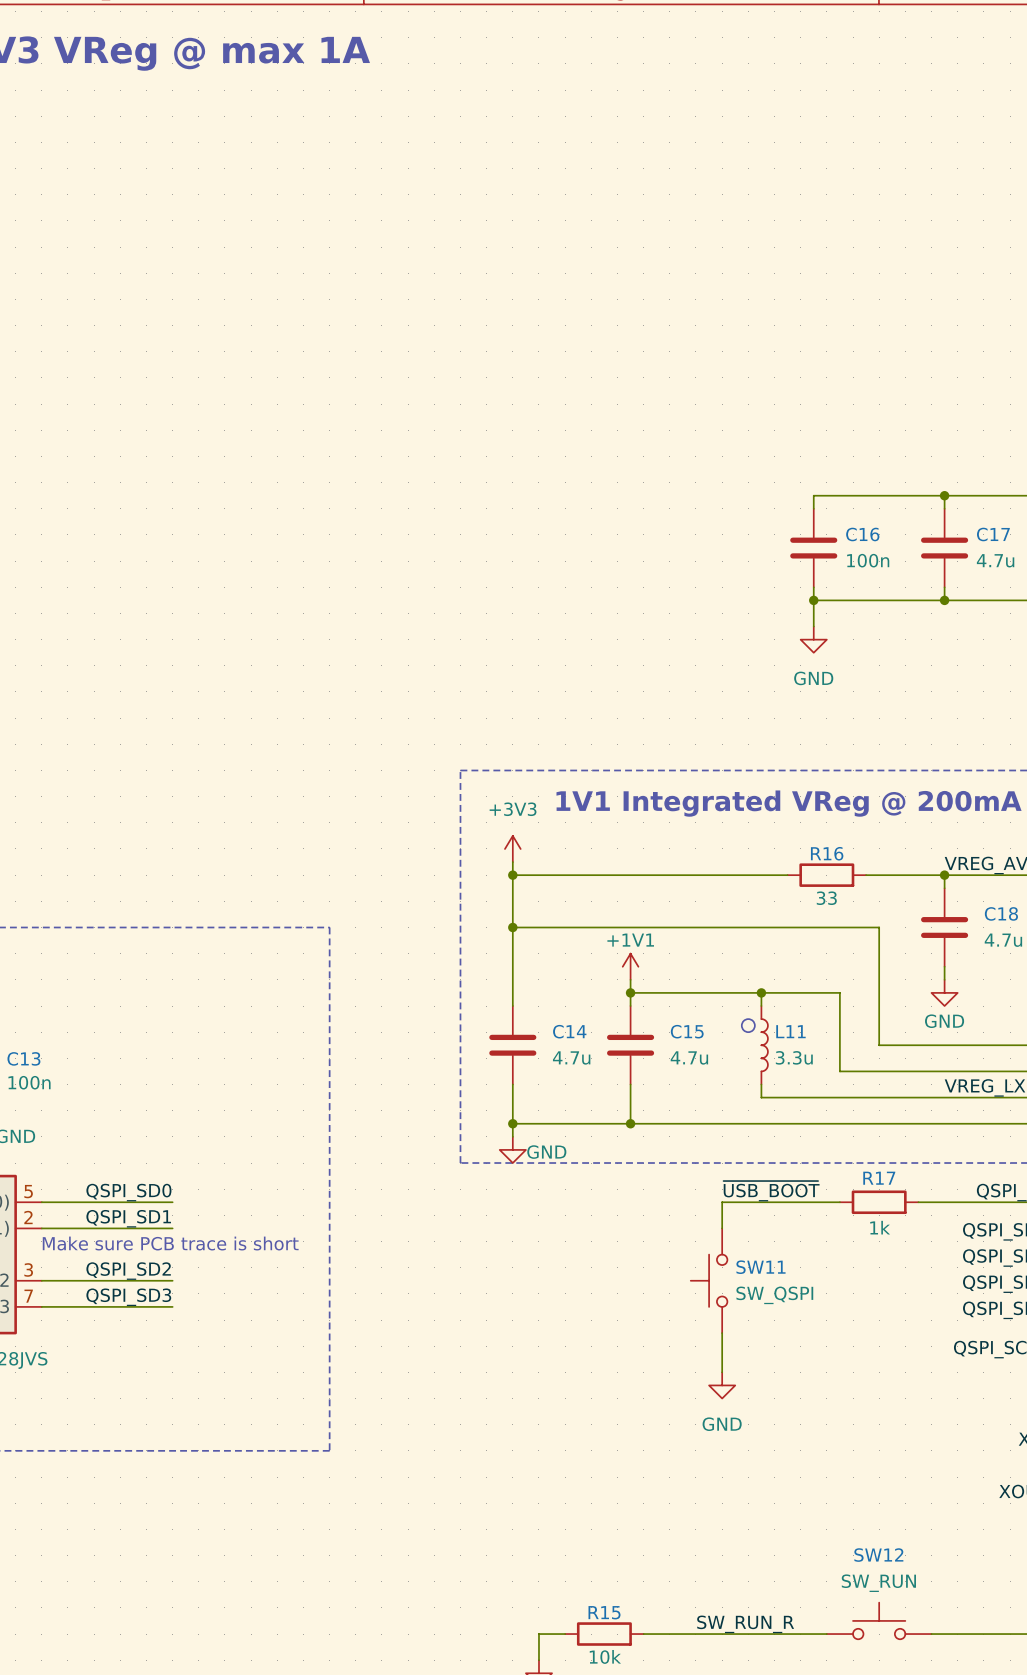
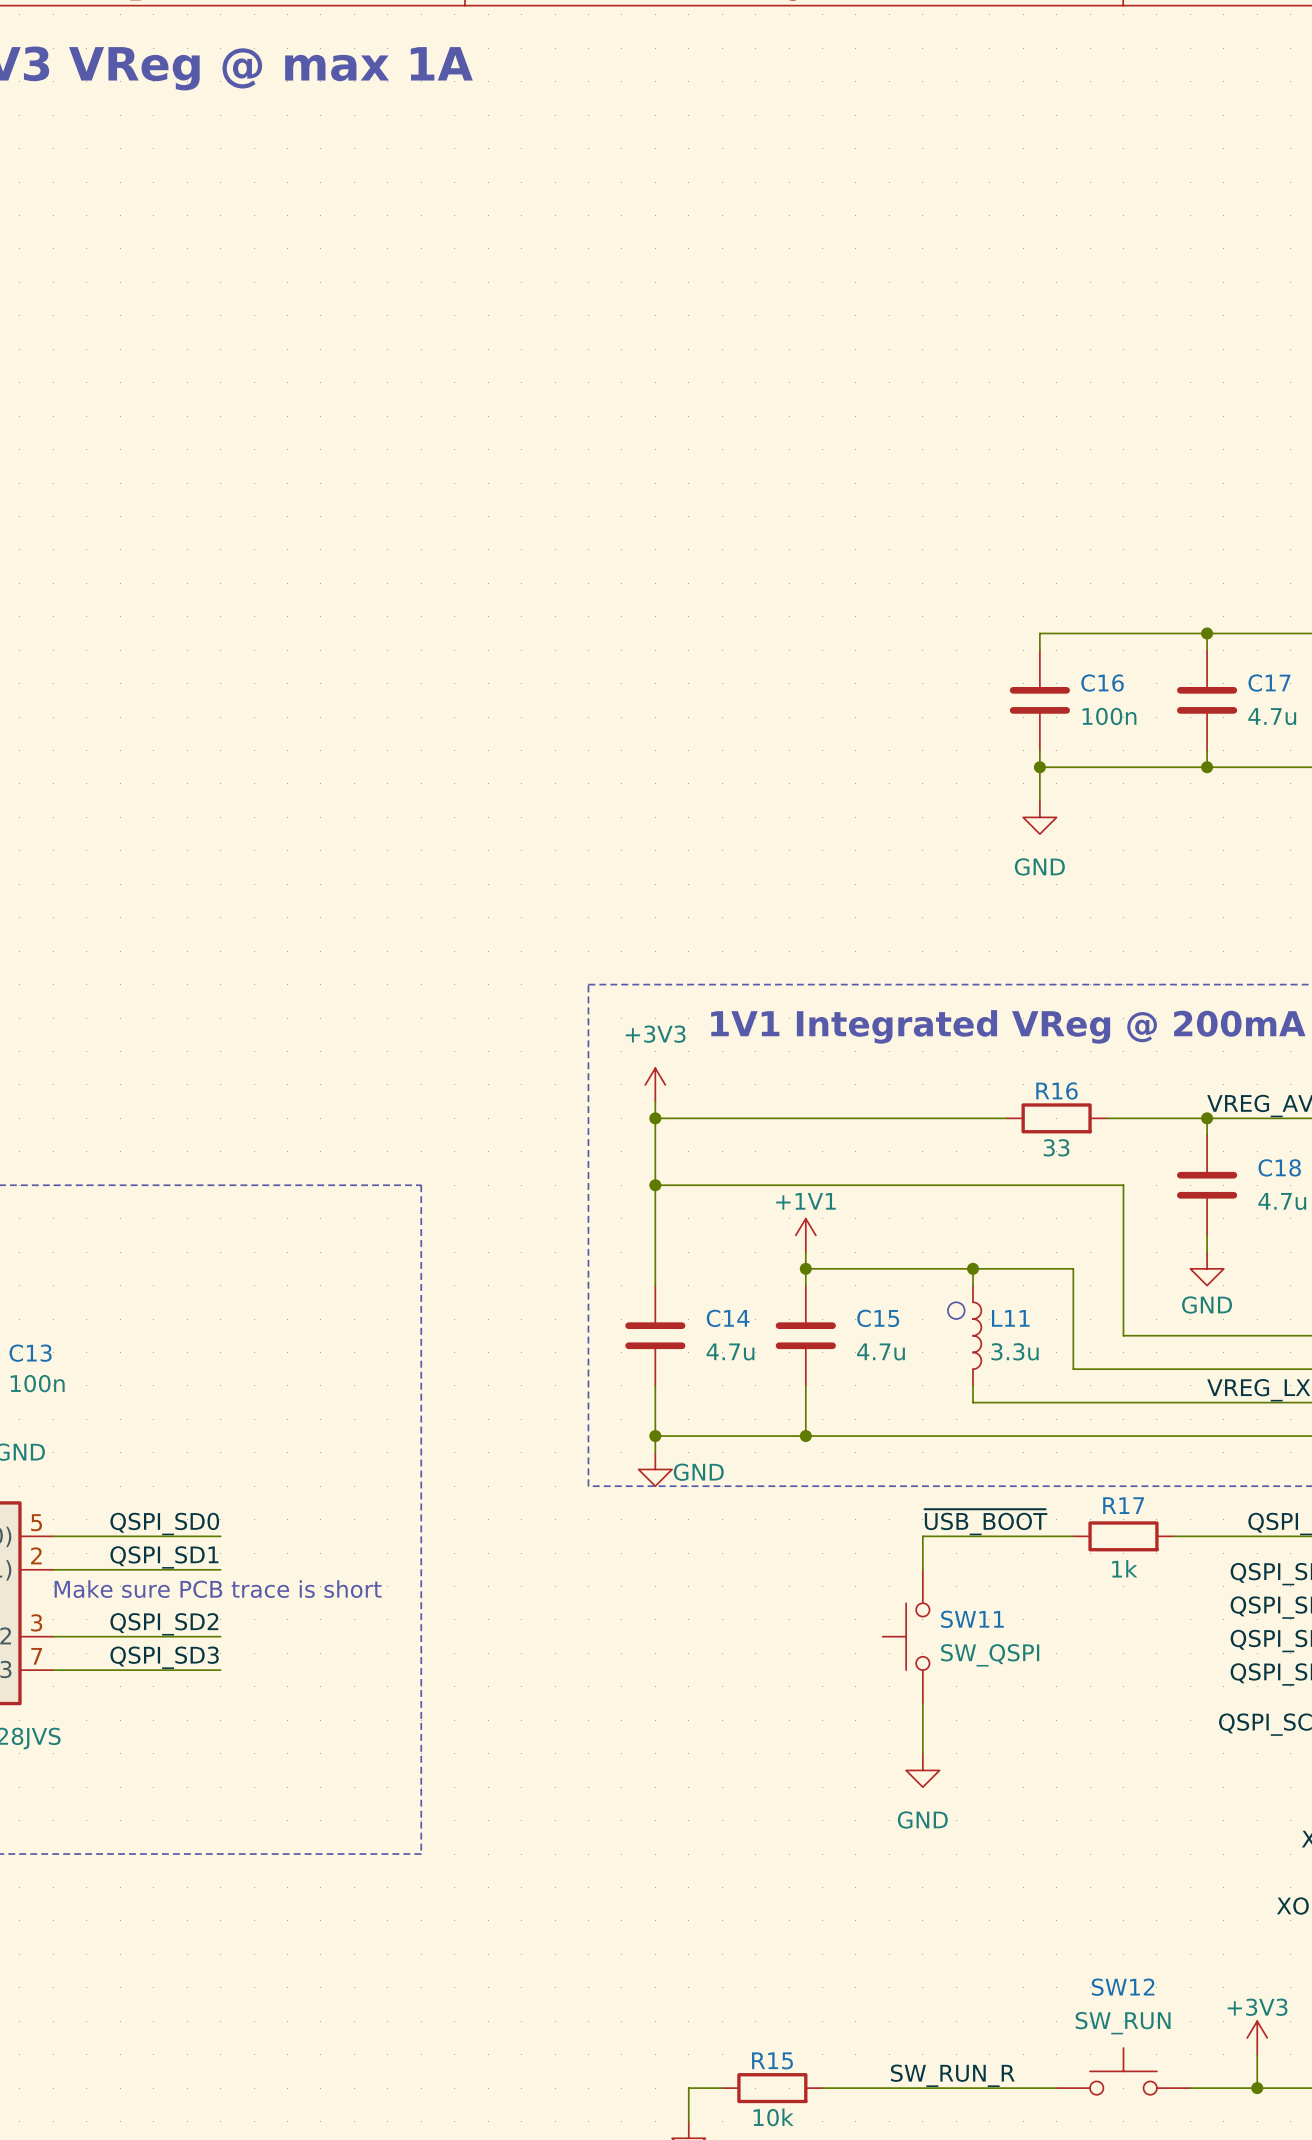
power symbol: none -> +3V3 (1257, 2037)
wire: none -> (1257, 2054) (1257, 2088)
junction: none -> (1257, 2088)

